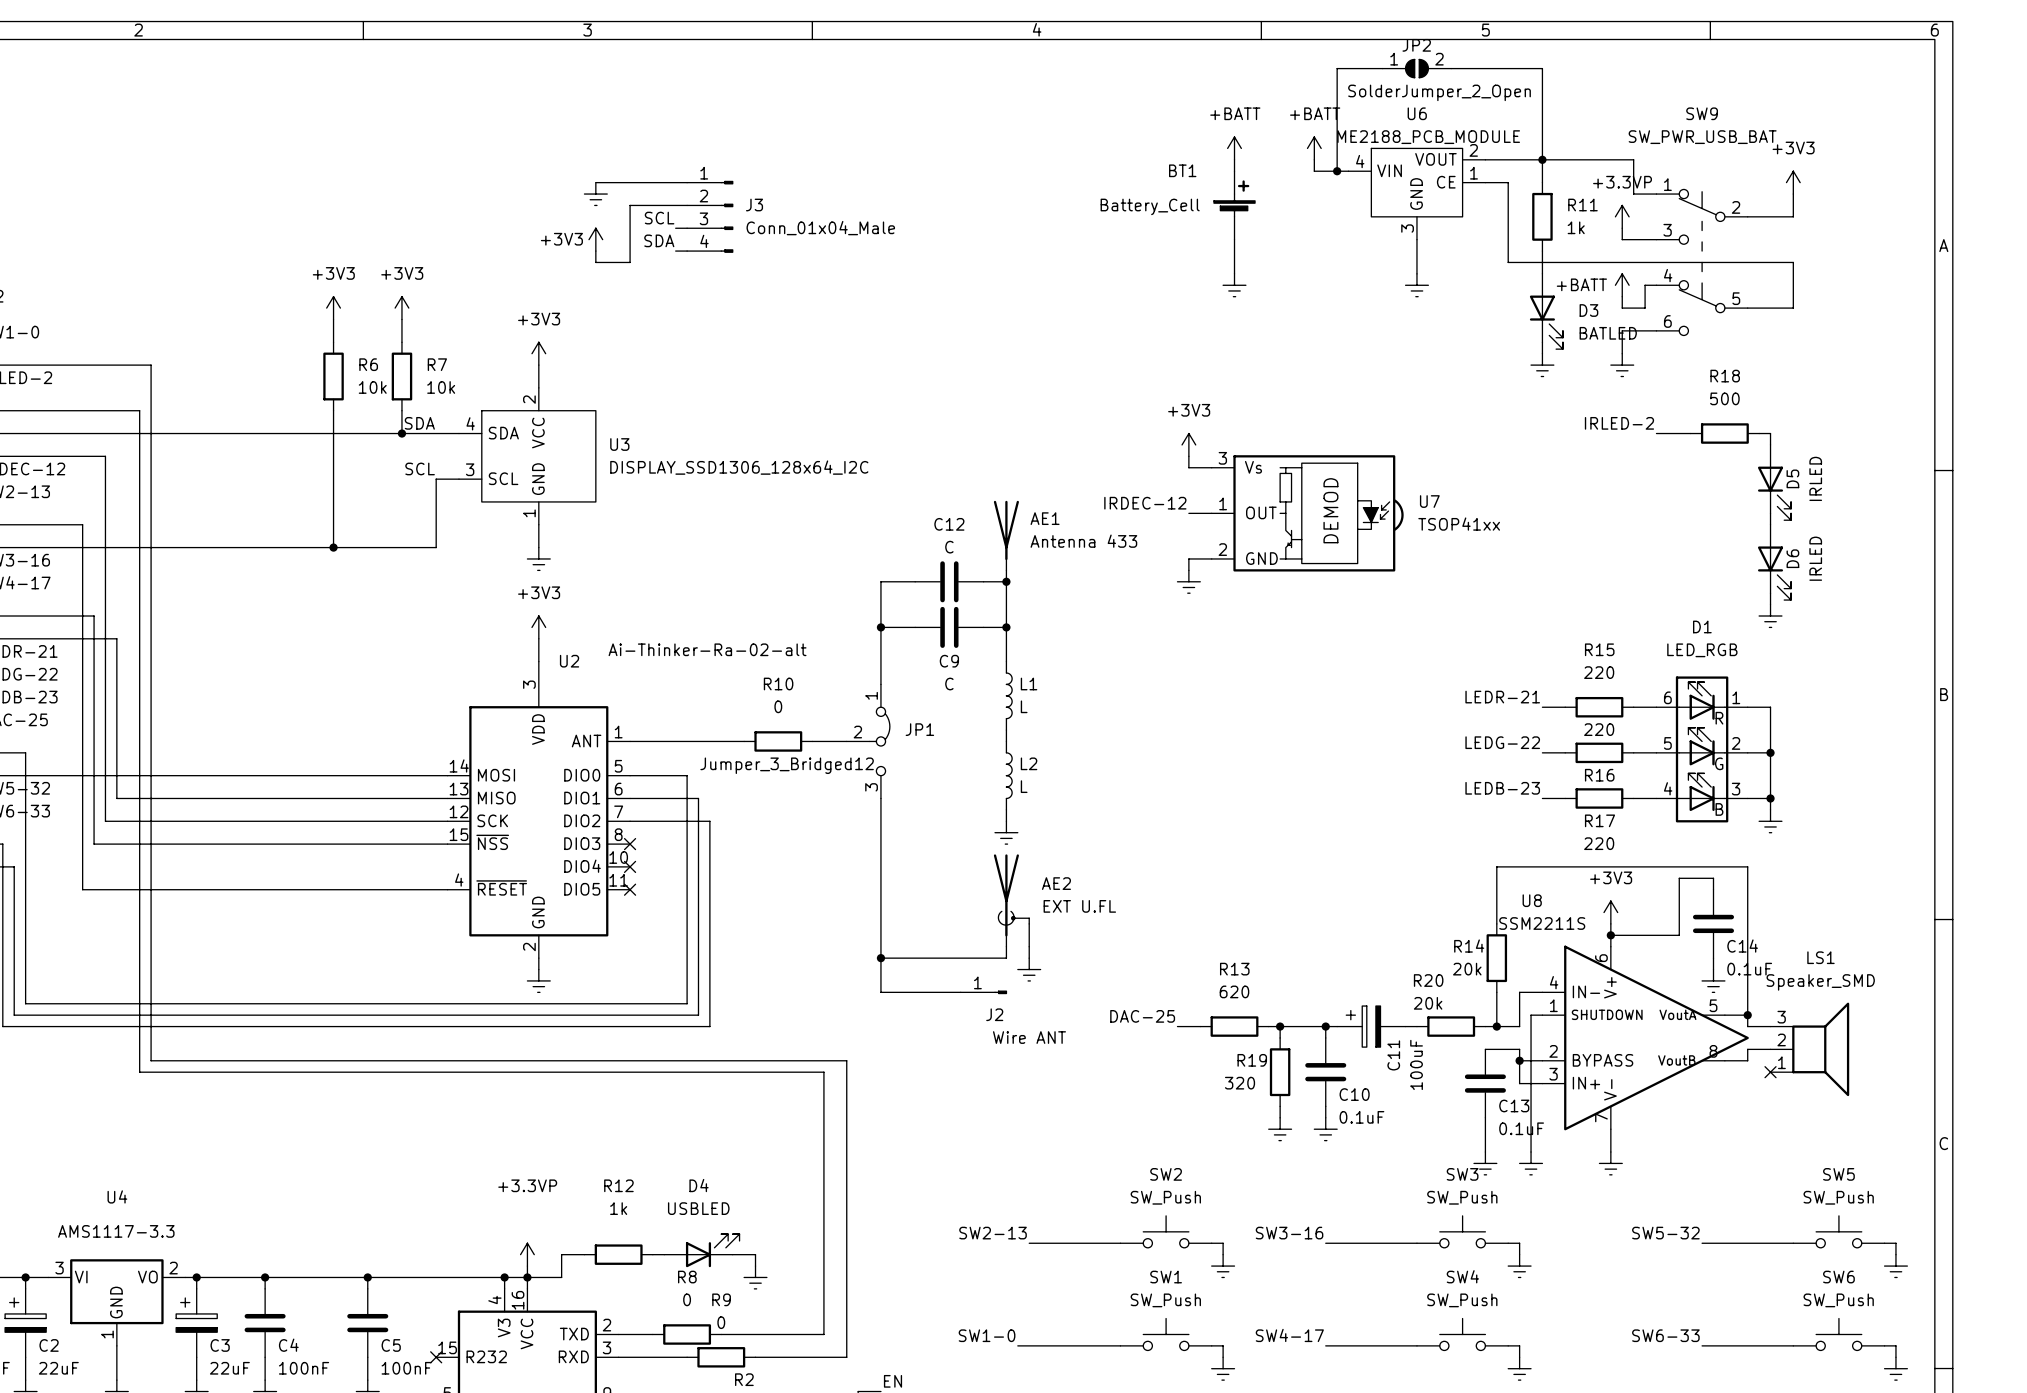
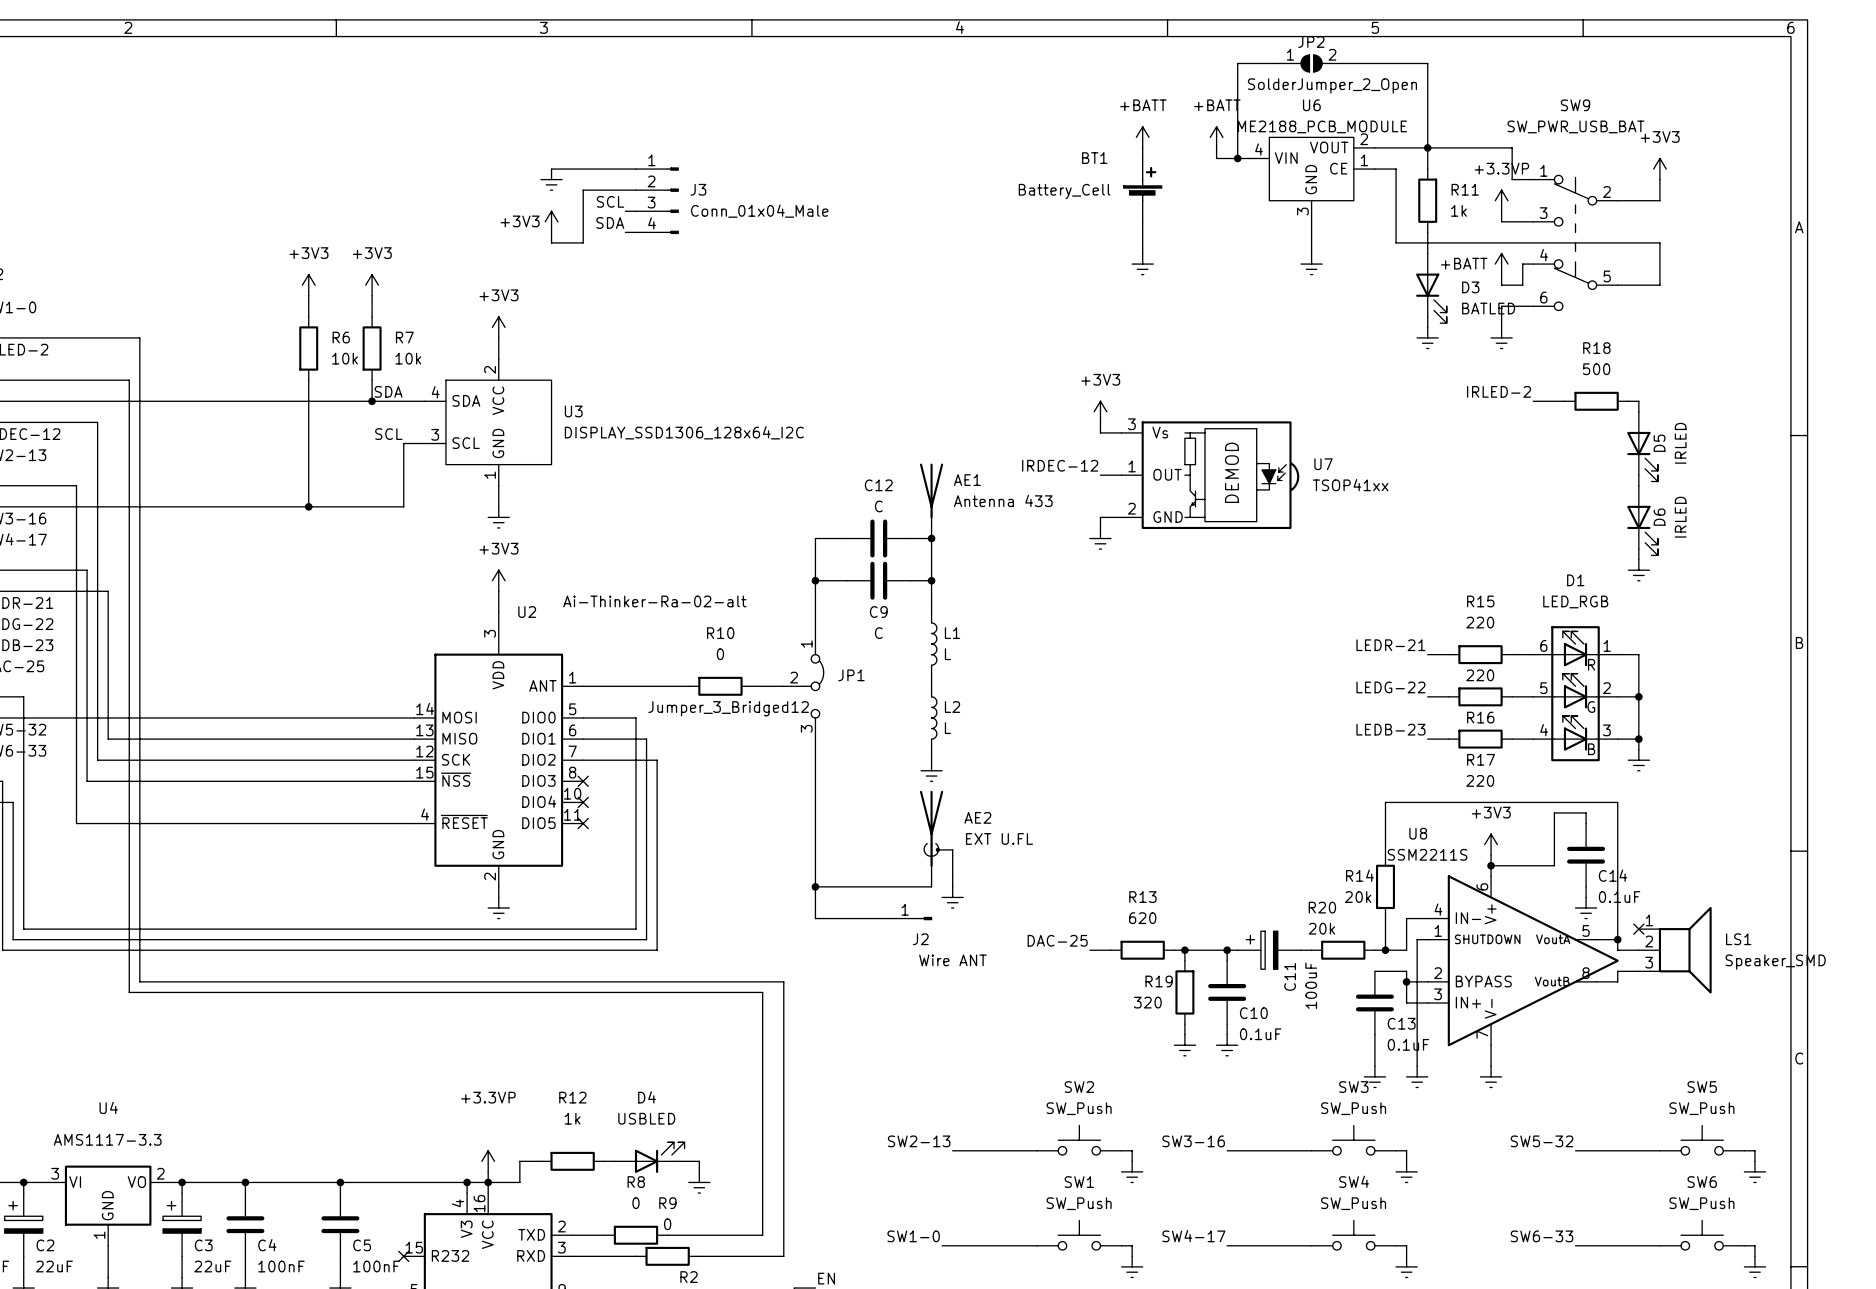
LS1 name position: LS1 (1820, 957) -> LS1 (1738, 939)
LS1 value position: Speaker_SMD (1820, 982) -> Speaker_SMD (1775, 962)
no-connect mark: none -> (1638, 929)
LS1 flip: as is (1820, 1049) -> up-down (1685, 950)
no-connect mark: (1770, 1072) -> none

